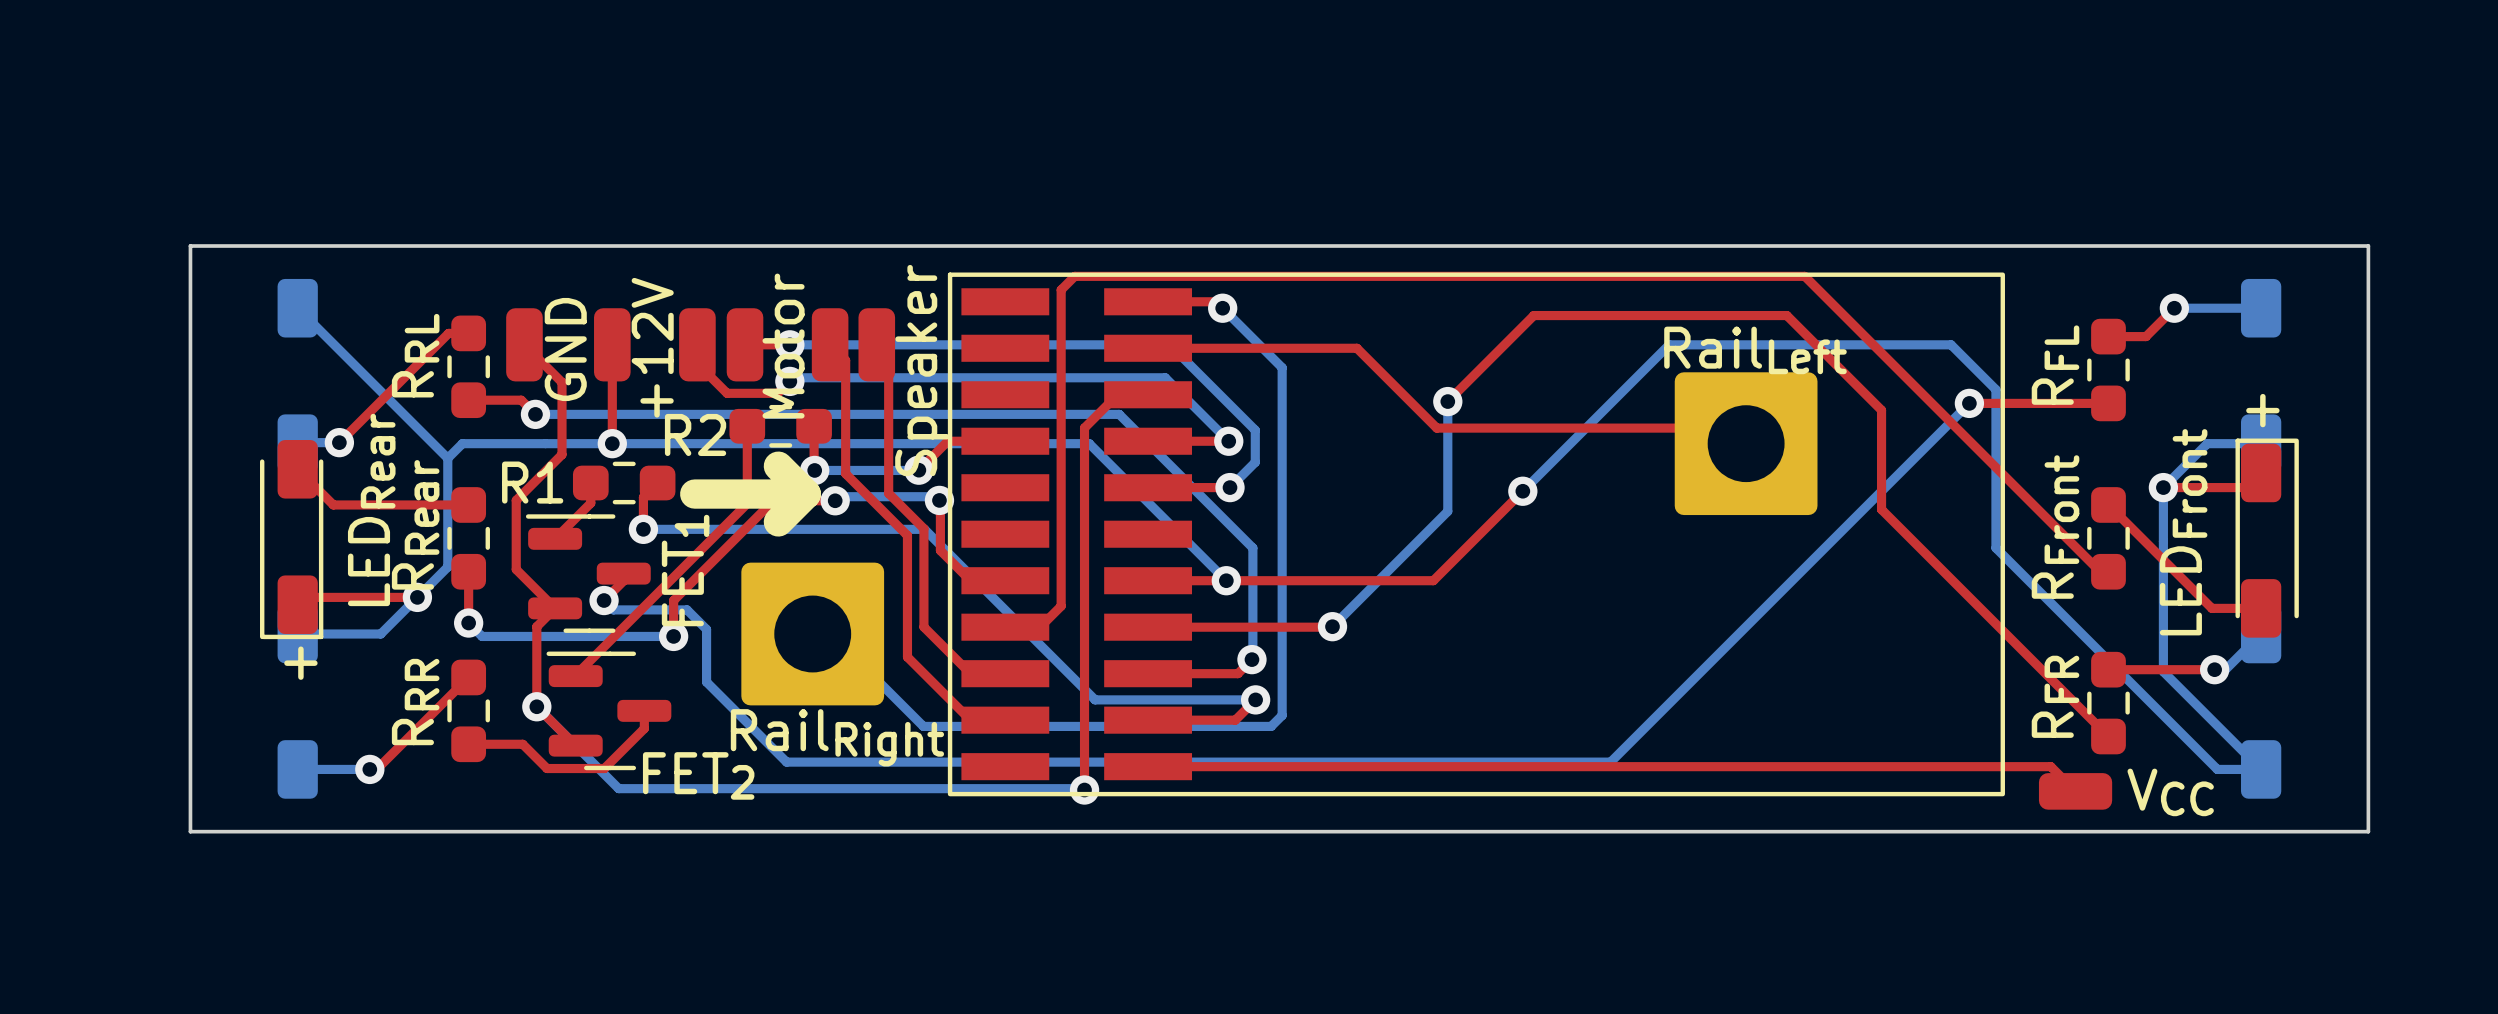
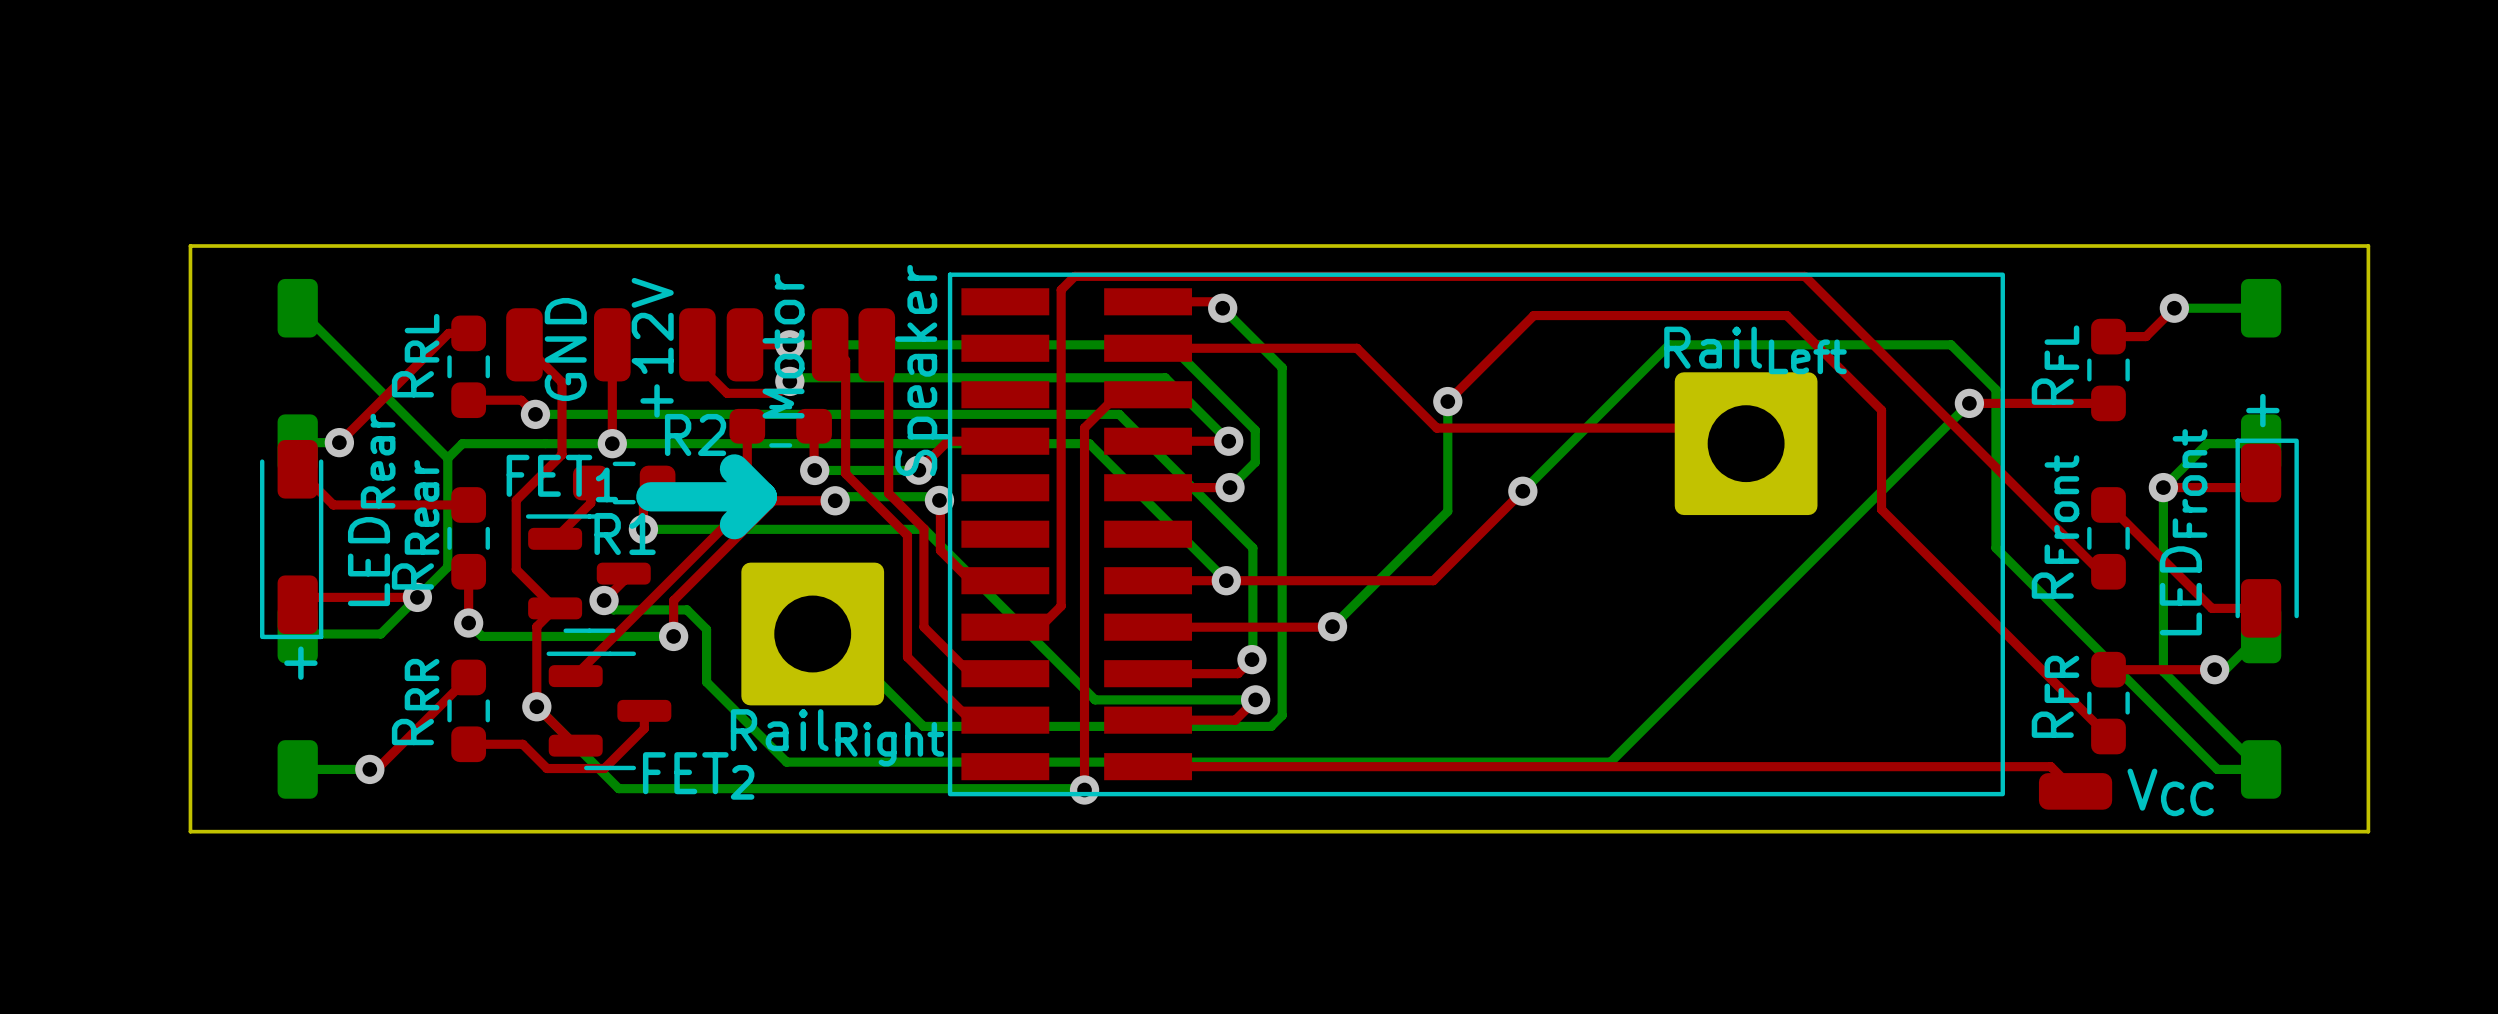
R1 name position: R1 (532, 482) -> R1 (625, 533)
text position: → (750, 494) -> → (706, 496)
text rotation: 0° (685, 570) -> 90° clockwise (562, 478)

